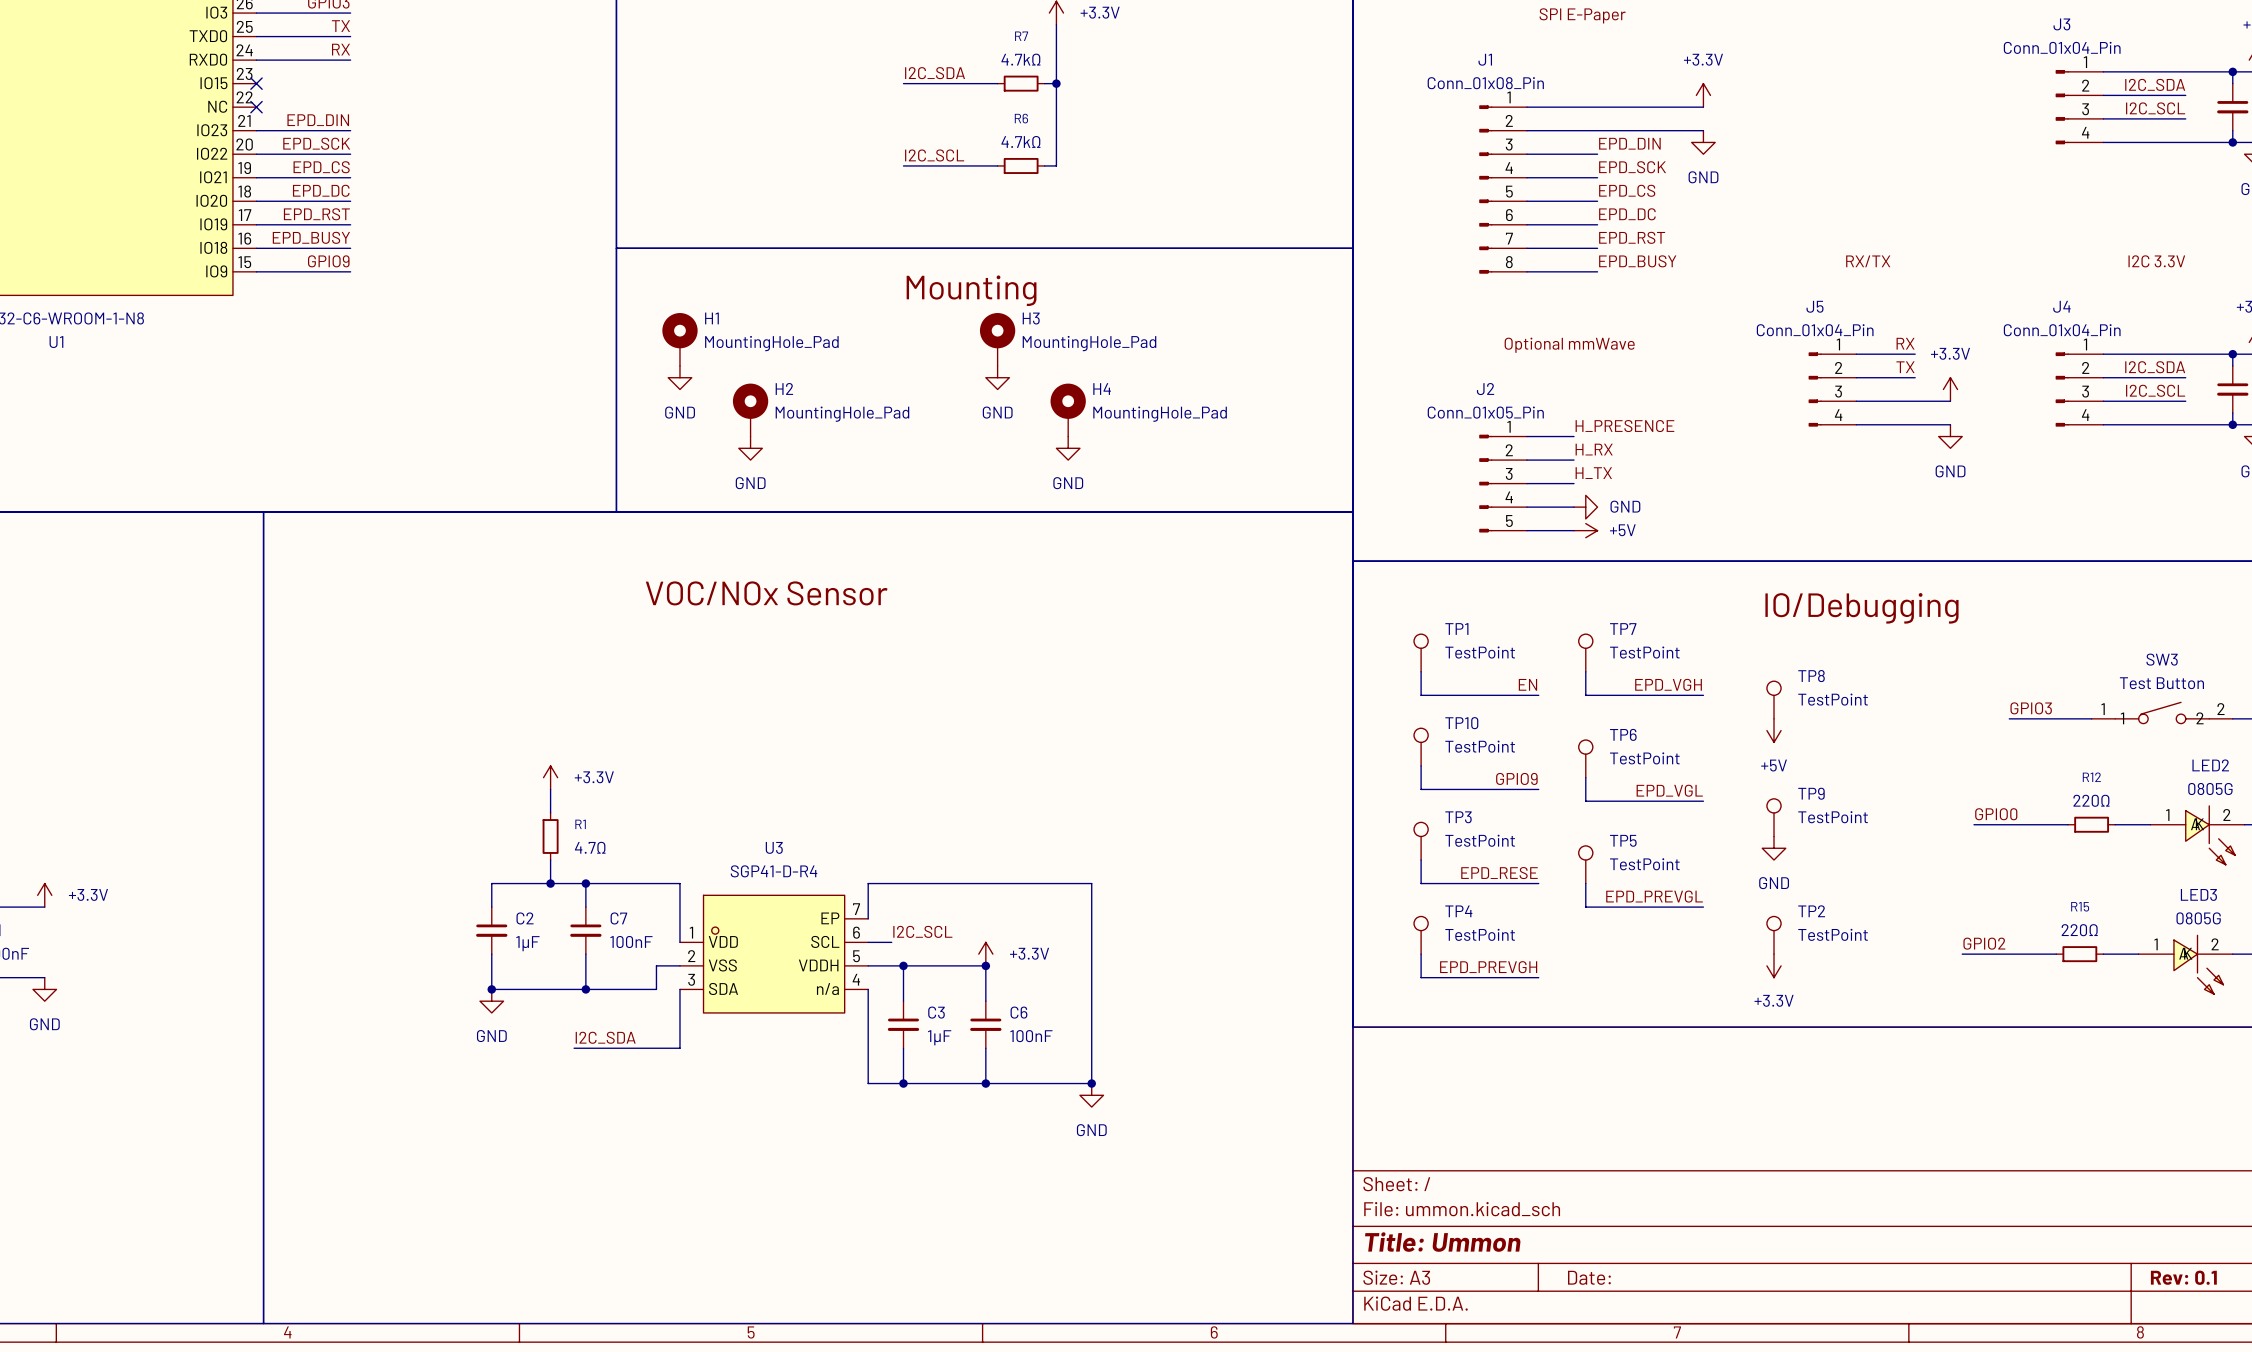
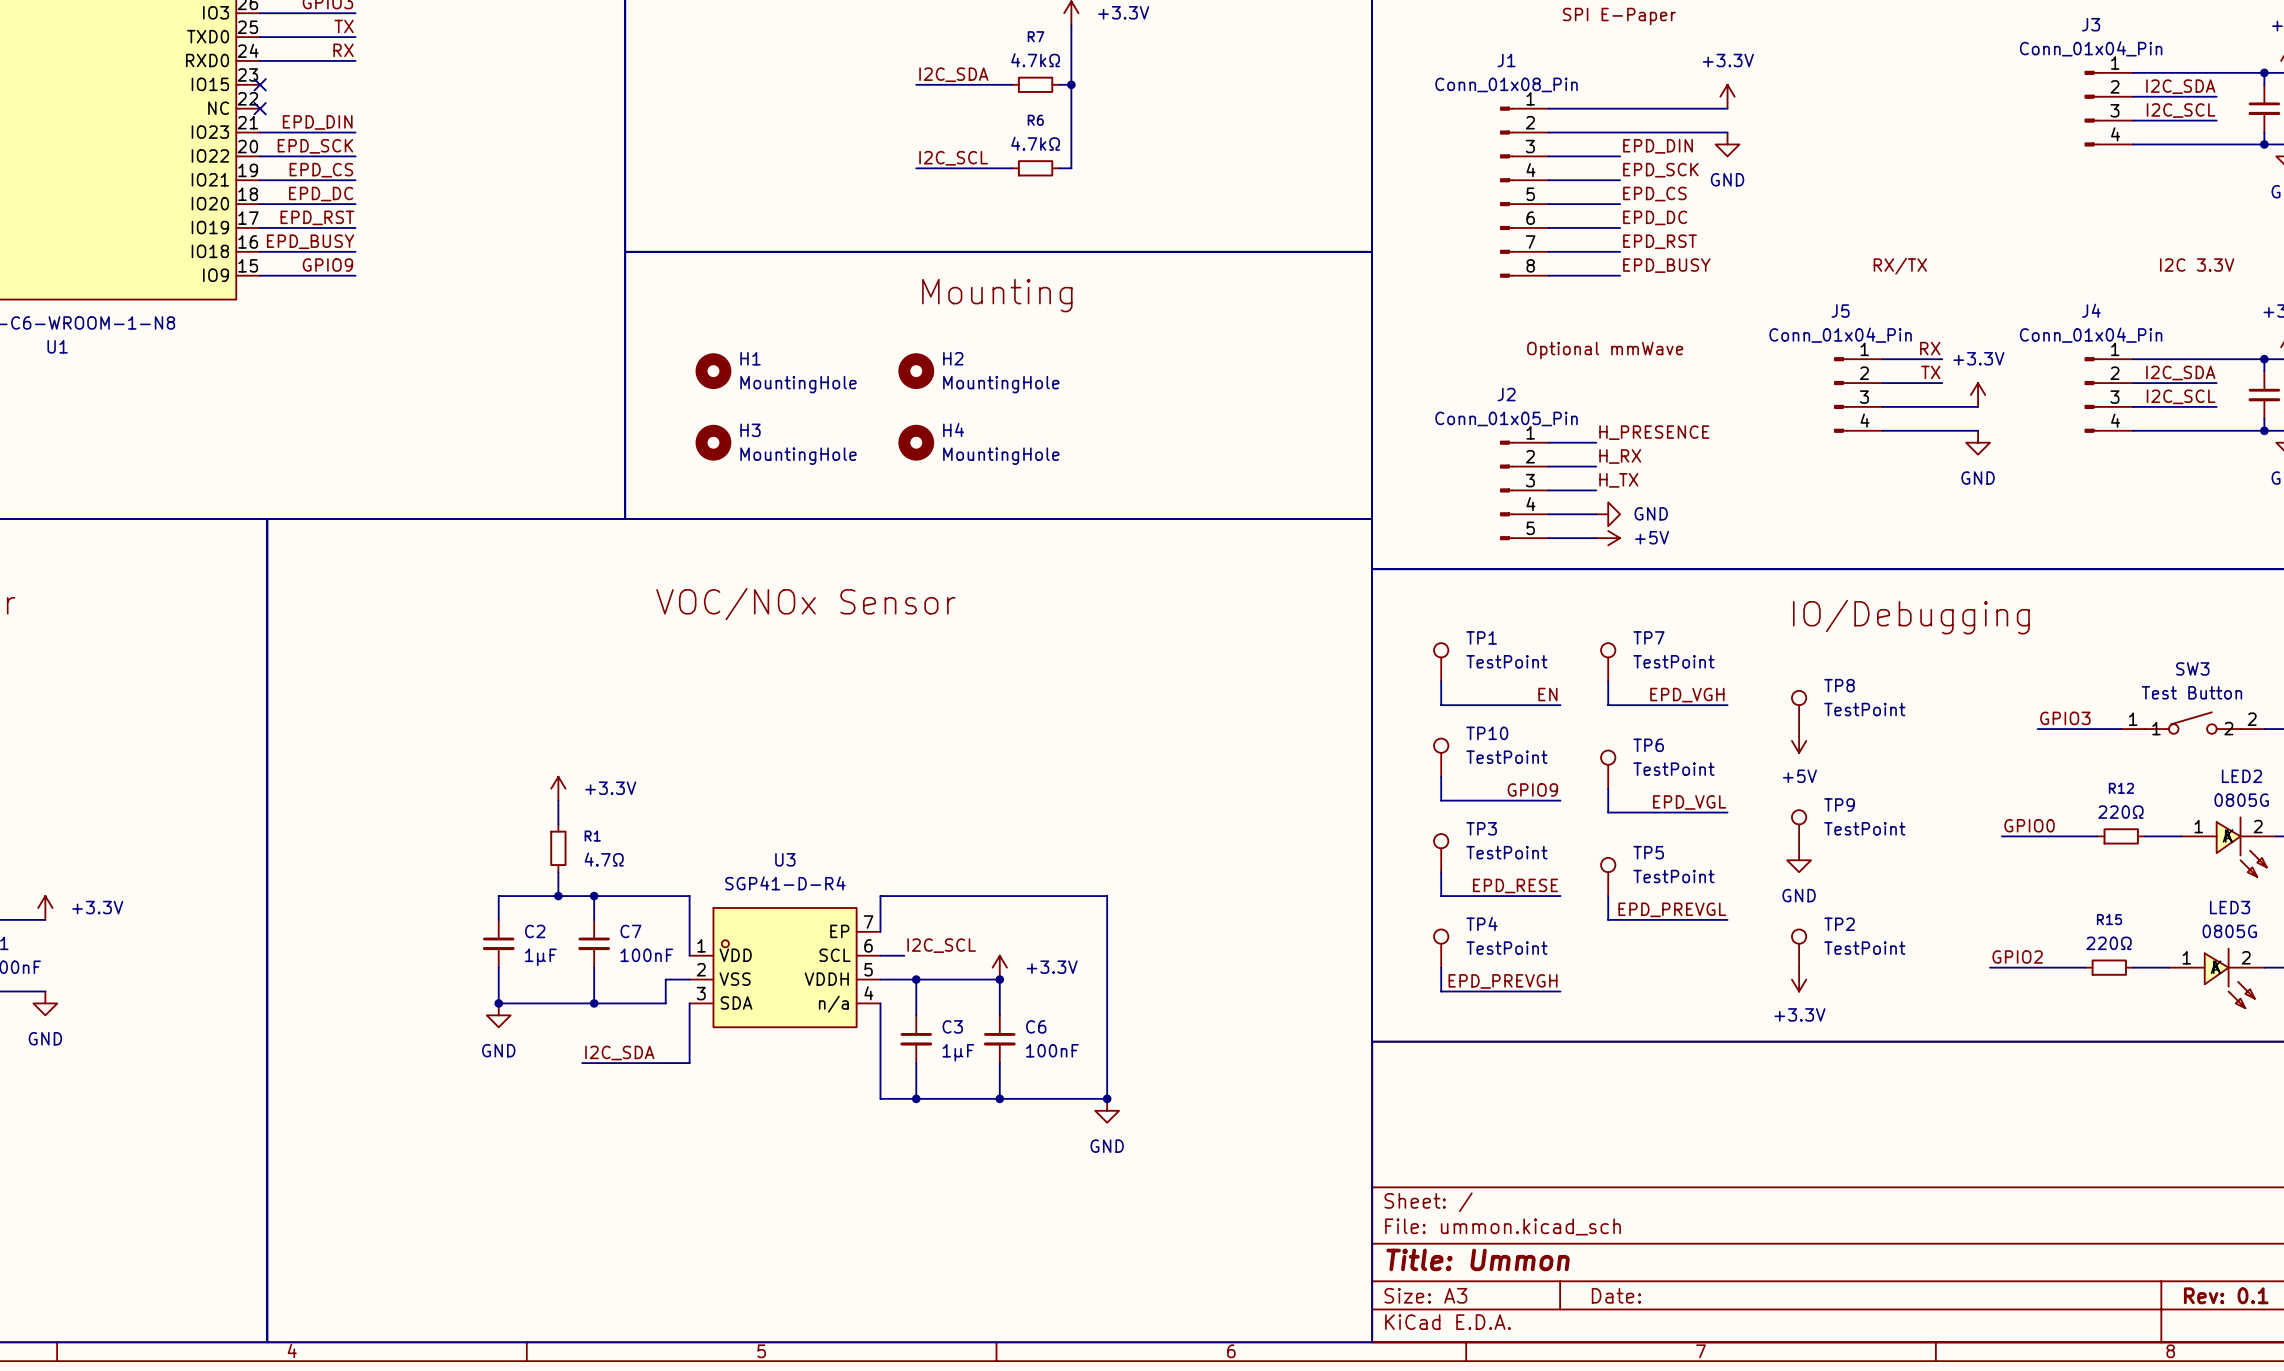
H1 symbol: [662, 313, 698, 366] -> [695, 353, 732, 390]
H3 symbol: [979, 313, 1016, 366] -> [695, 424, 732, 461]
H1 value: MountingHole_Pad (771, 343) -> MountingHole (798, 384)
H3 value: MountingHole_Pad (1089, 343) -> MountingHole (798, 456)
power symbol: GND (679, 377) -> none
power symbol: GND (997, 377) -> none
H2 symbol: [732, 383, 769, 437] -> [898, 353, 935, 390]
H4 symbol: [1050, 383, 1086, 437] -> [898, 424, 935, 461]
H2 value: MountingHole_Pad (842, 414) -> MountingHole (1001, 384)
H4 value: MountingHole_Pad (1160, 414) -> MountingHole (1001, 456)
power symbol: GND (750, 448) -> none
power symbol: GND (1068, 448) -> none

